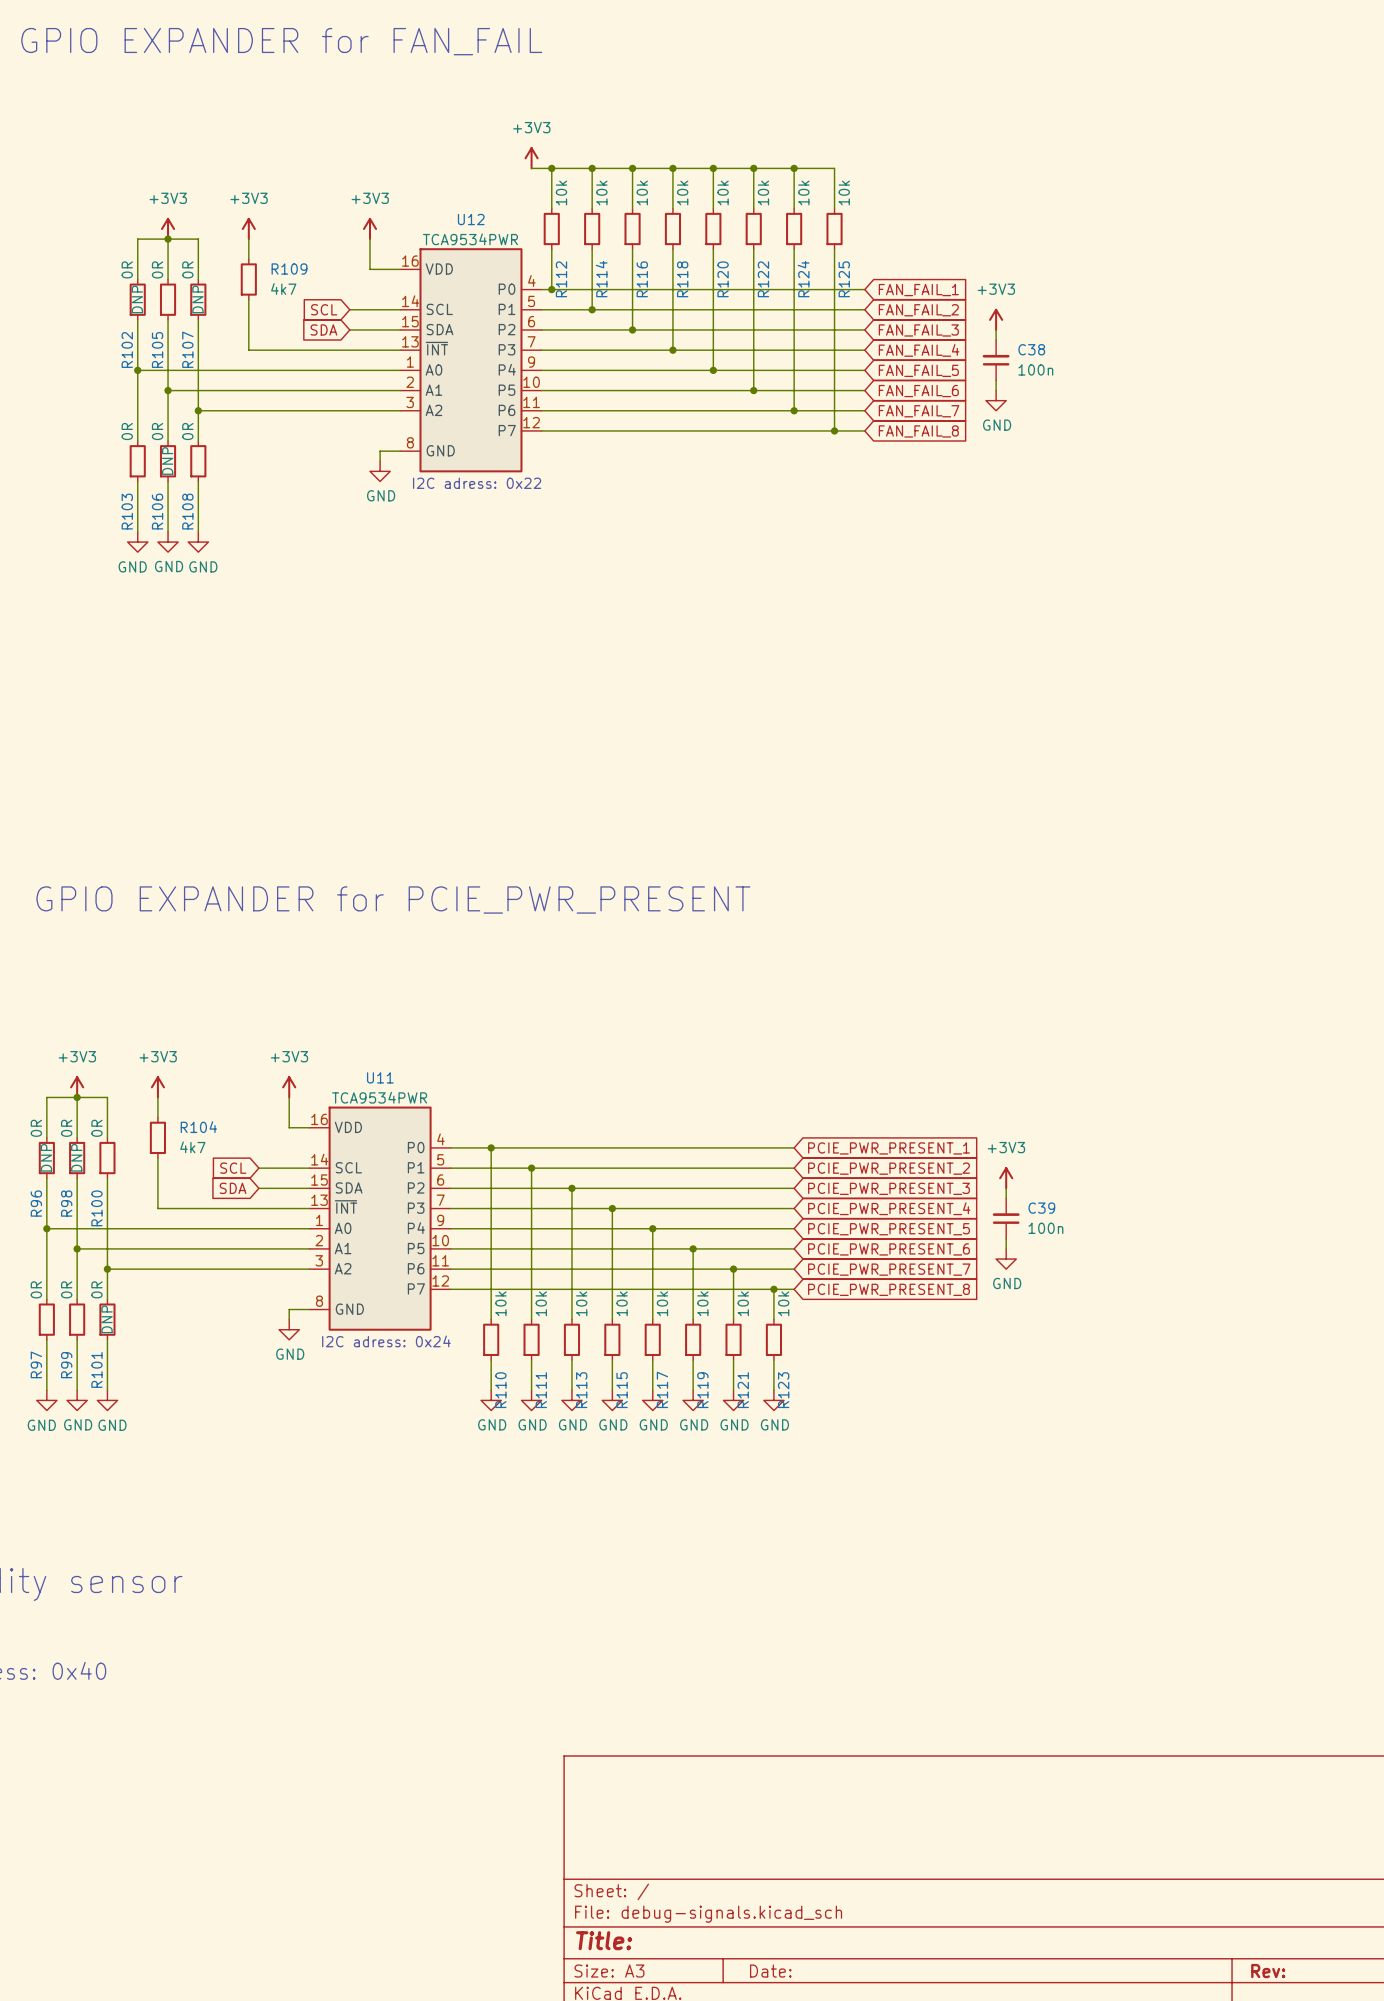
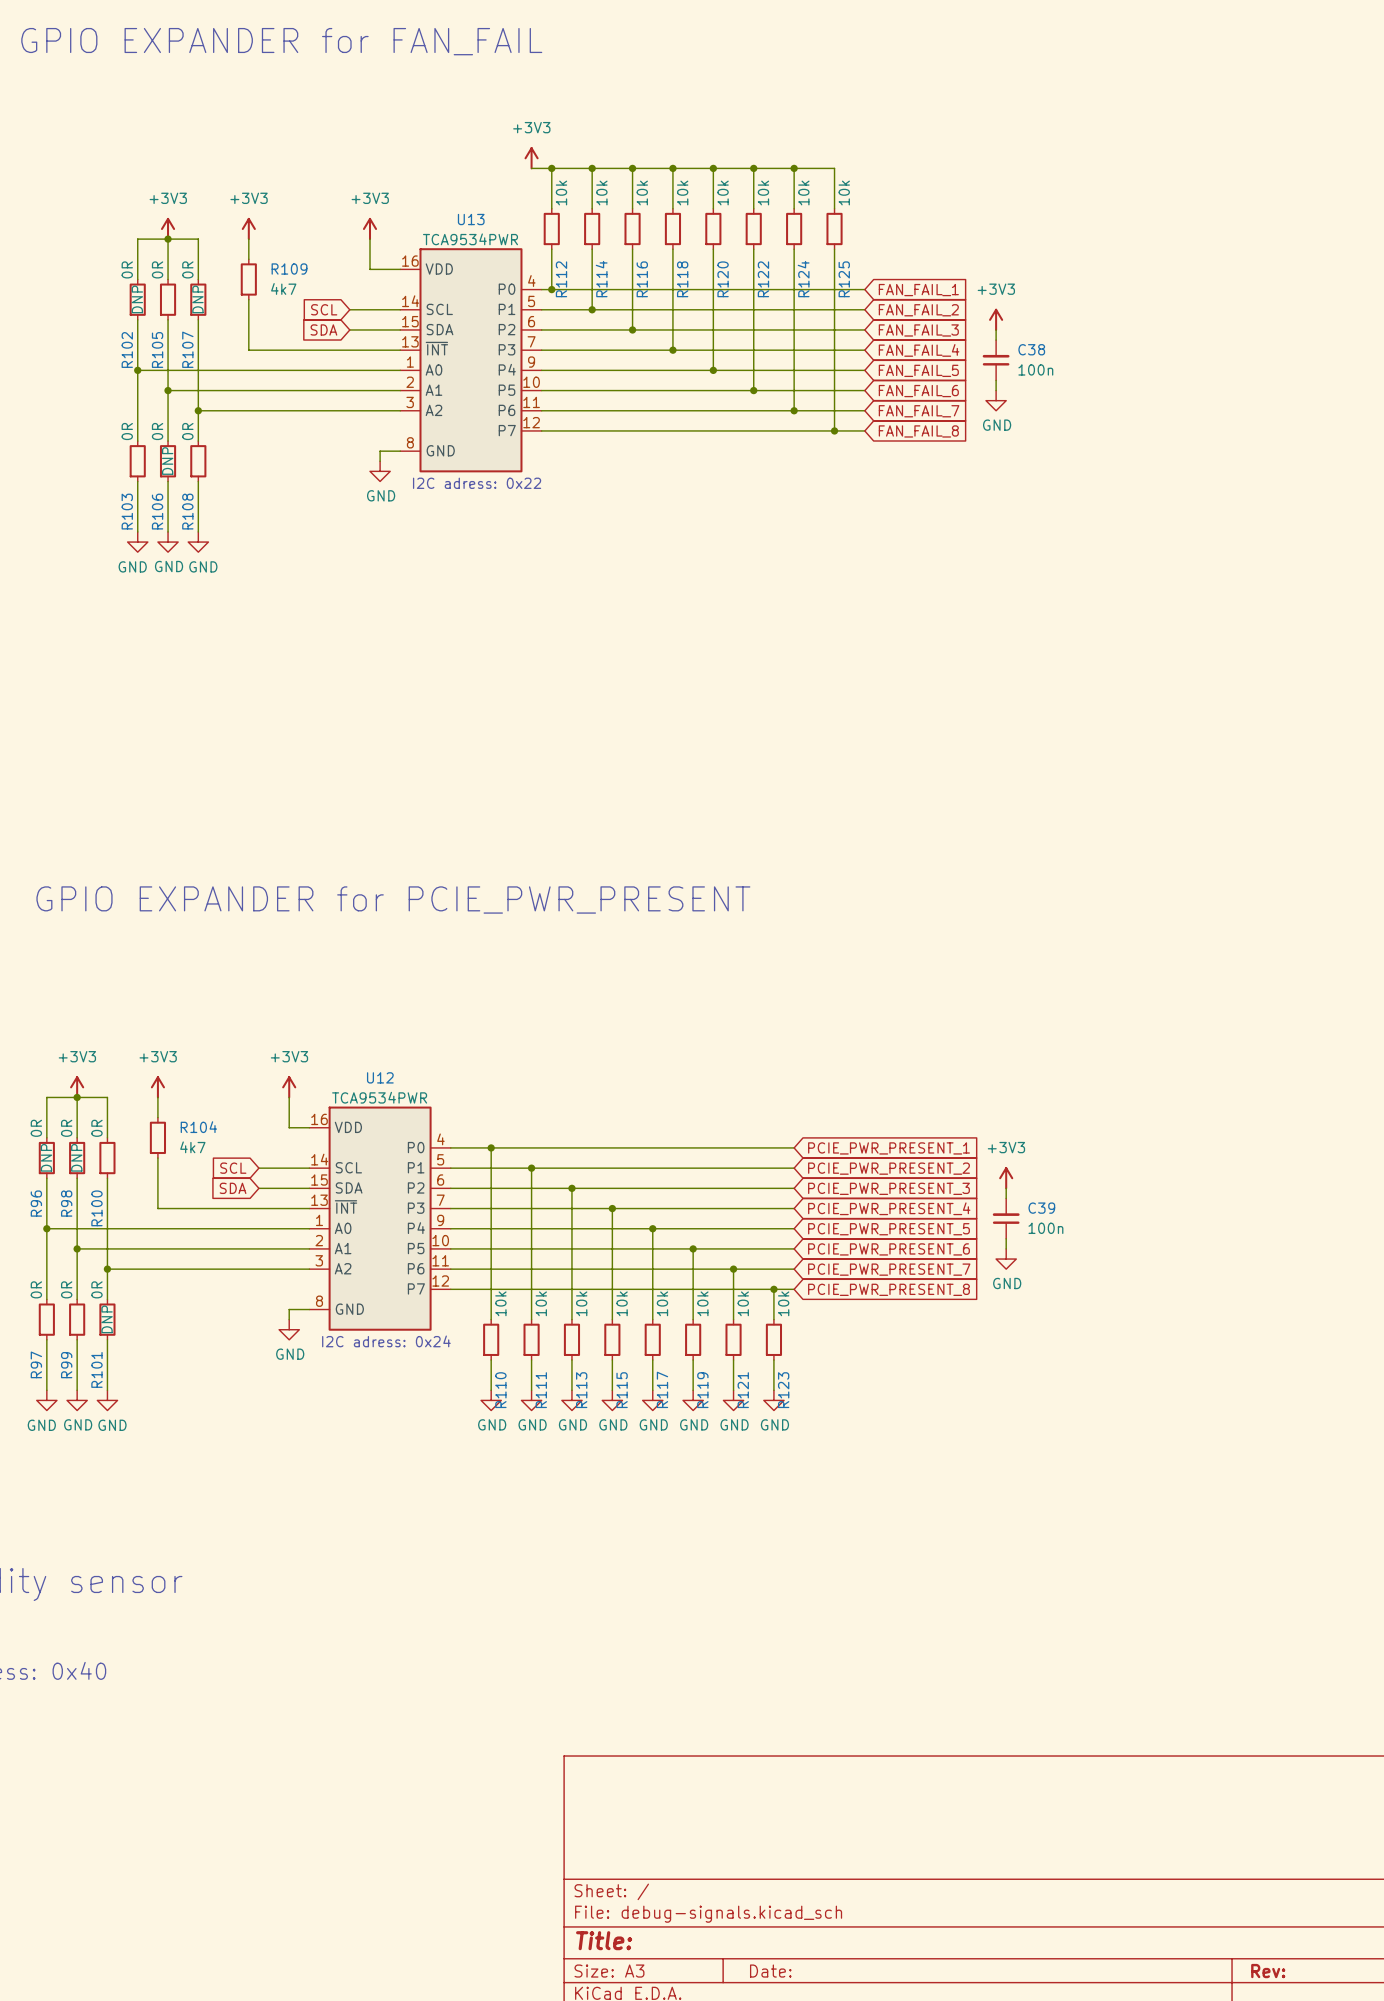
U12 name: U12 (471, 219) -> U13 (471, 219)
U11 name: U11 (380, 1077) -> U12 (380, 1077)

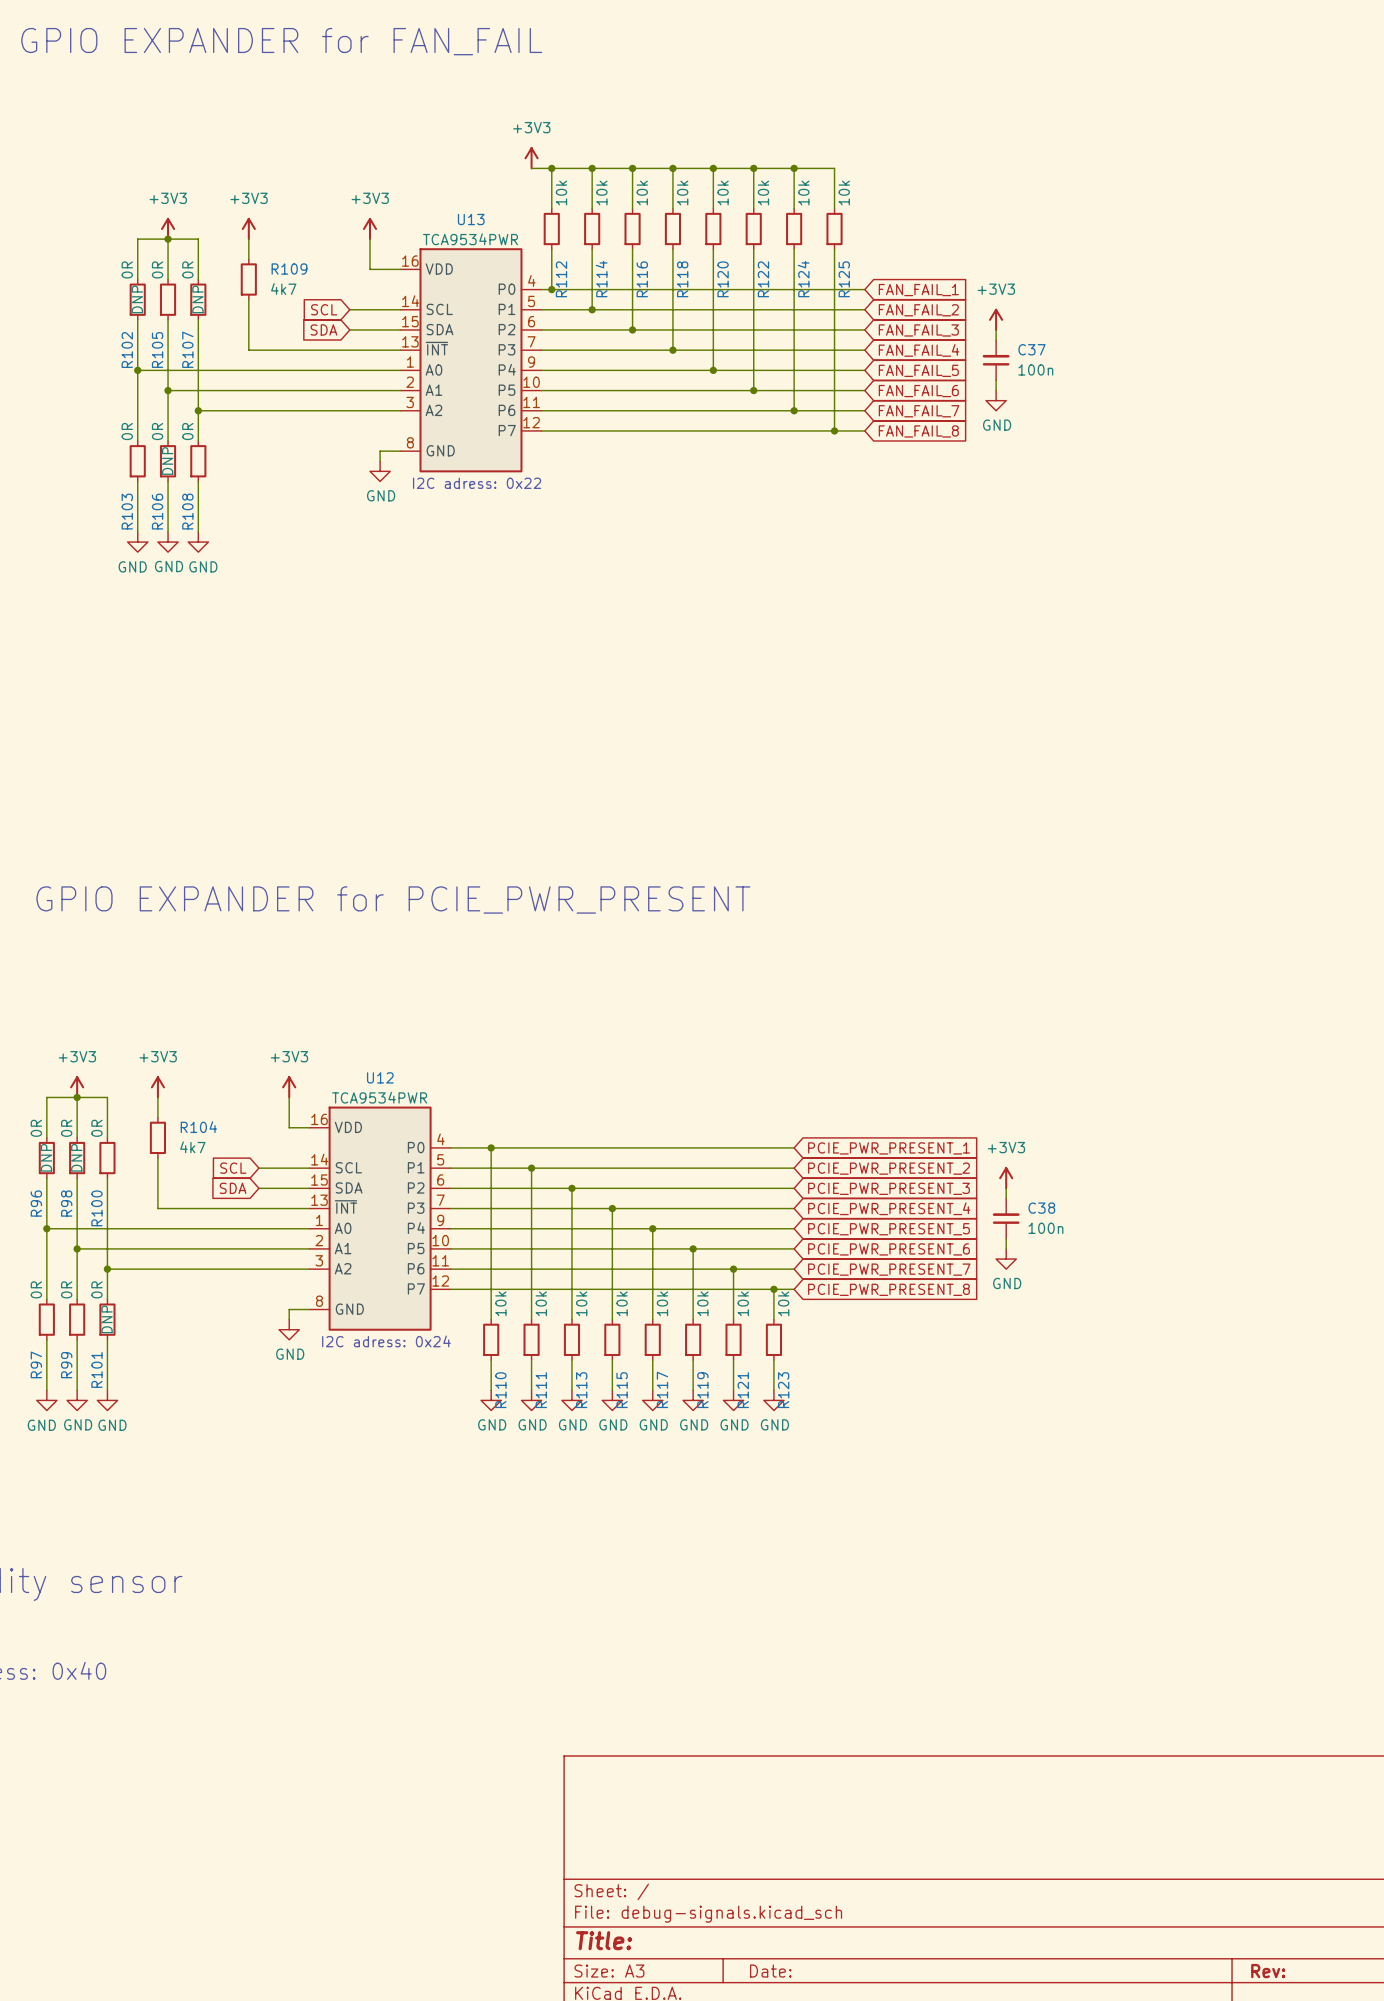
C38 name: C38 (1031, 349) -> C37 (1031, 349)
C39 name: C39 (1041, 1208) -> C38 (1041, 1208)

